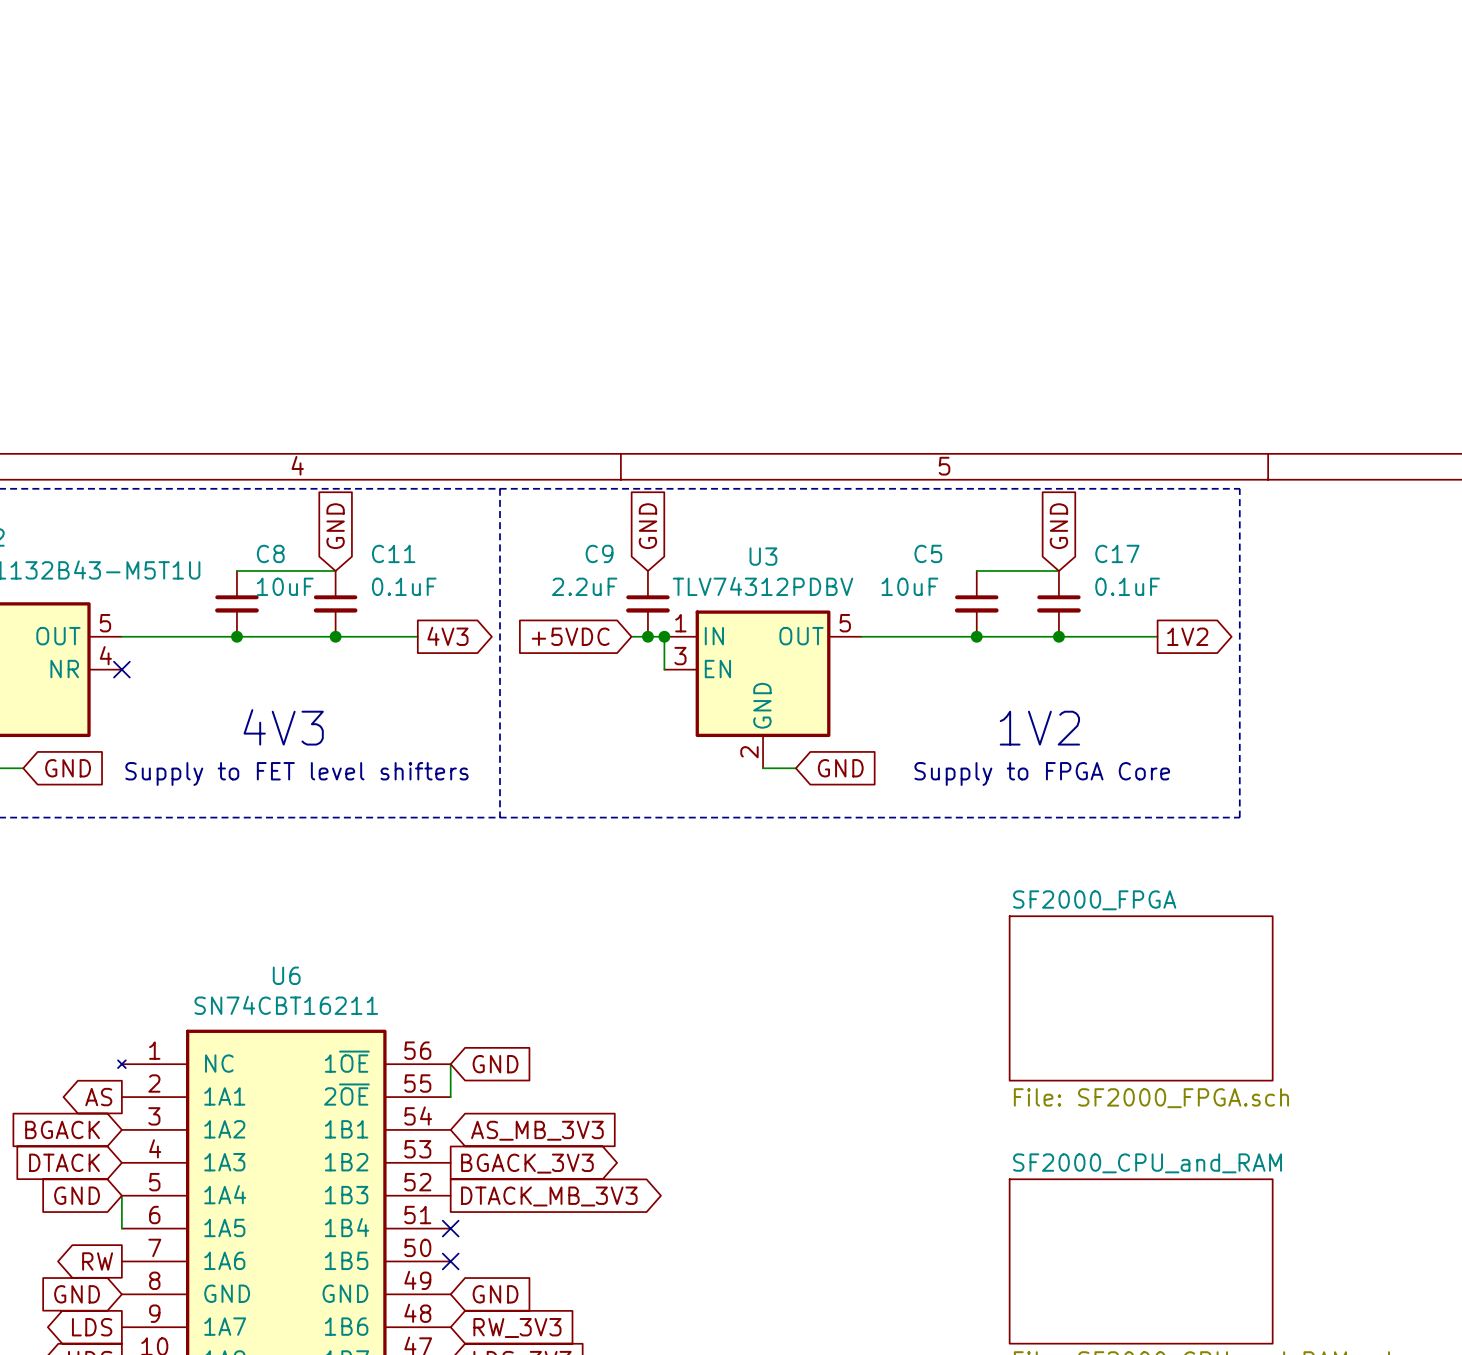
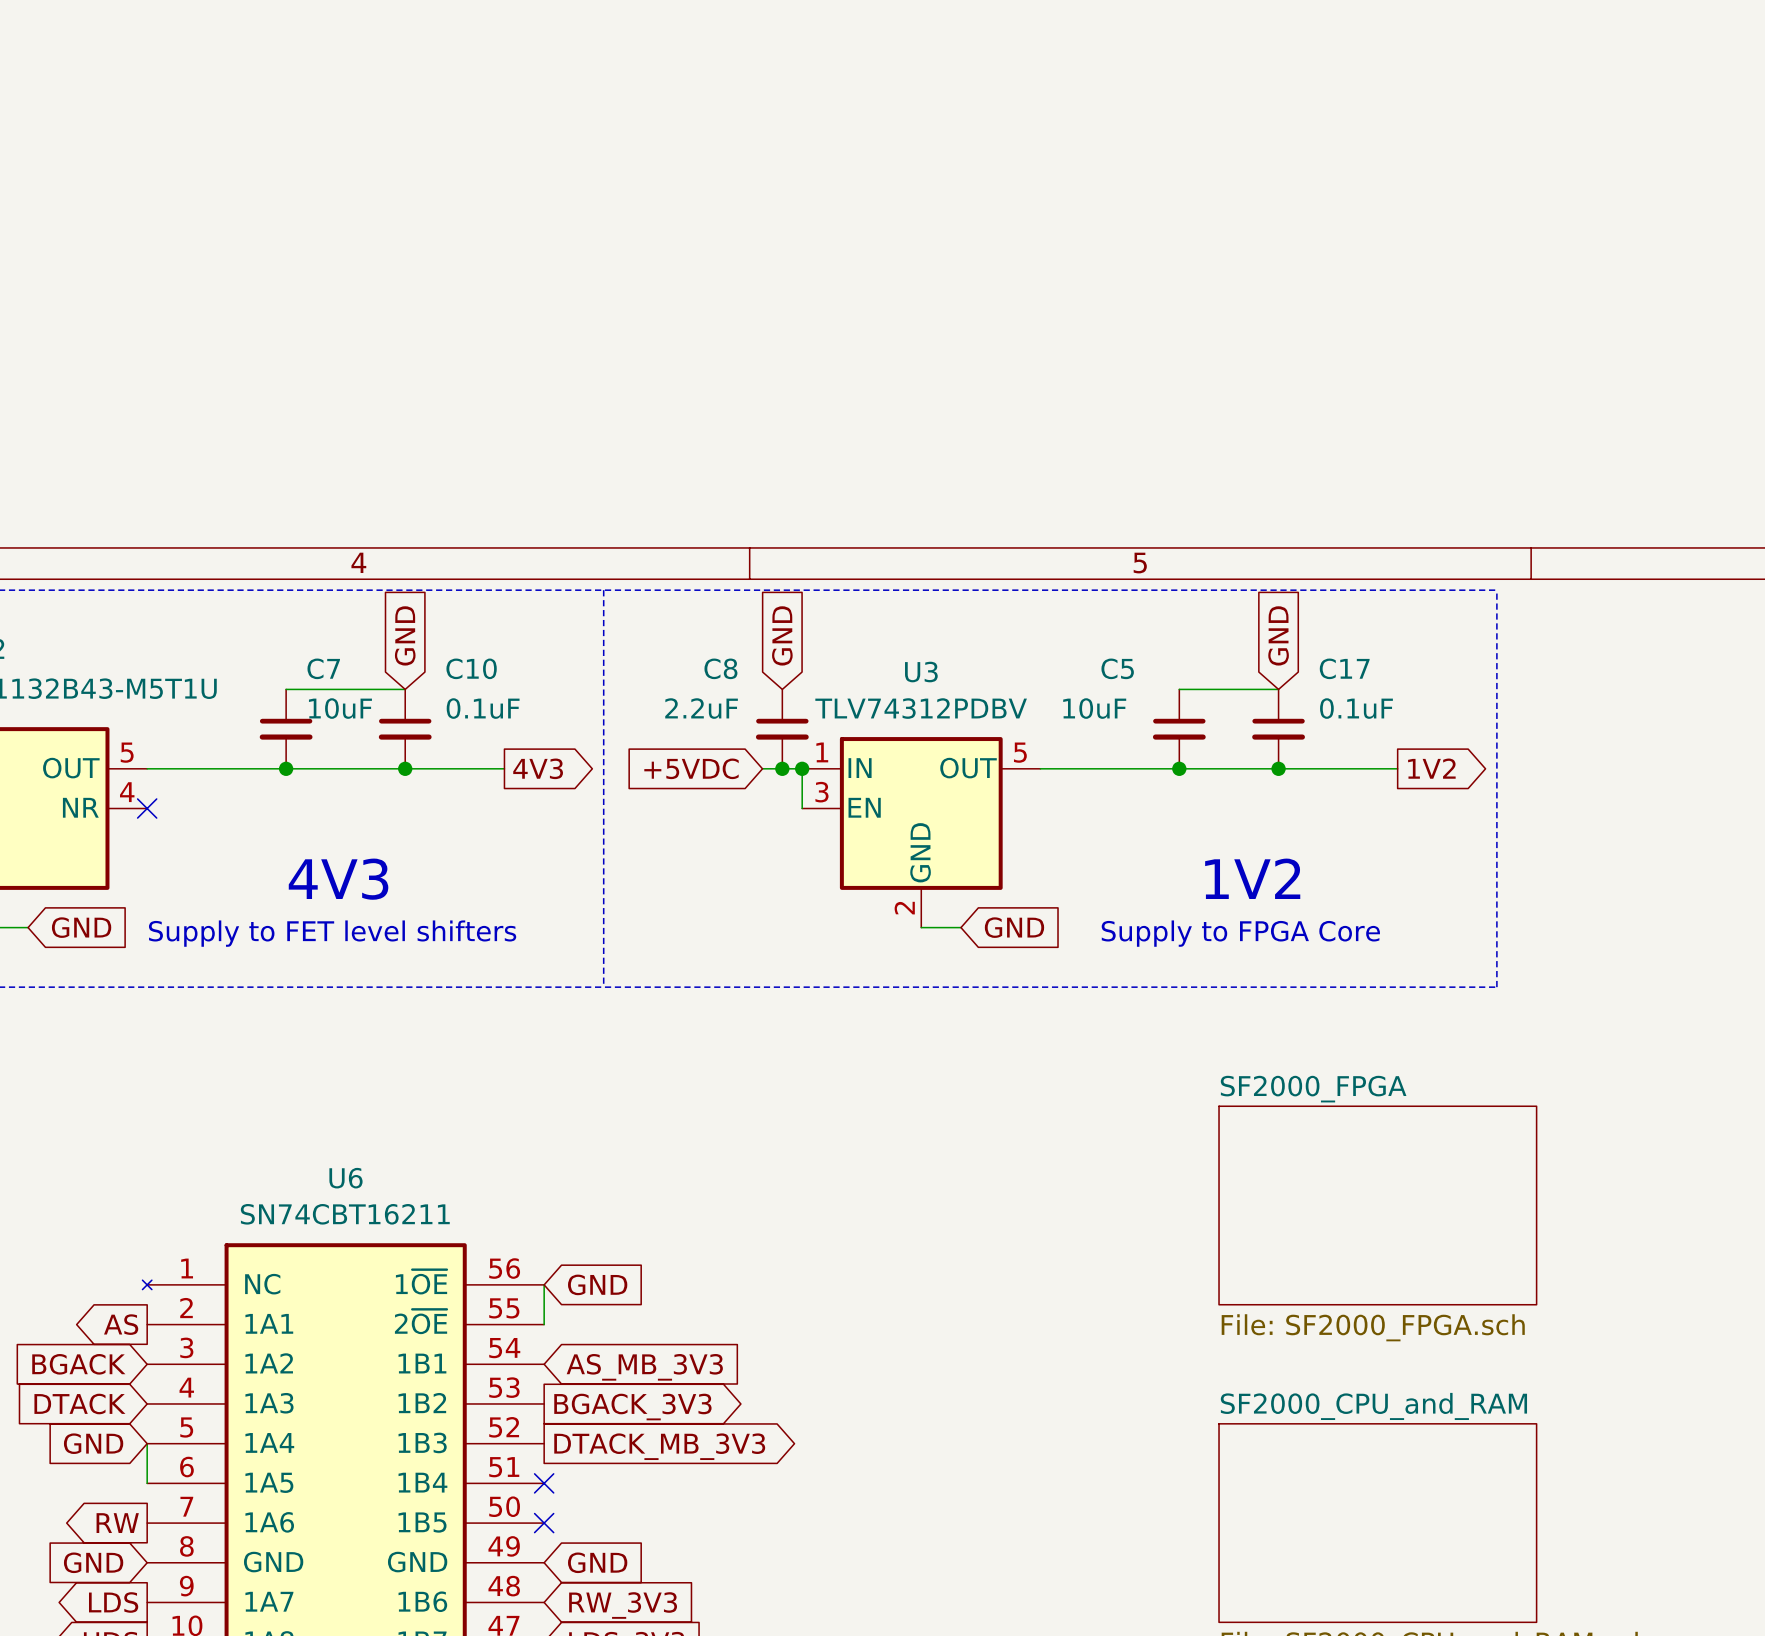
C8 name: C8 (270, 553) -> C7 (323, 668)
C11 name: C11 (393, 553) -> C10 (471, 668)
C9 name: C9 (599, 553) -> C8 (720, 668)

